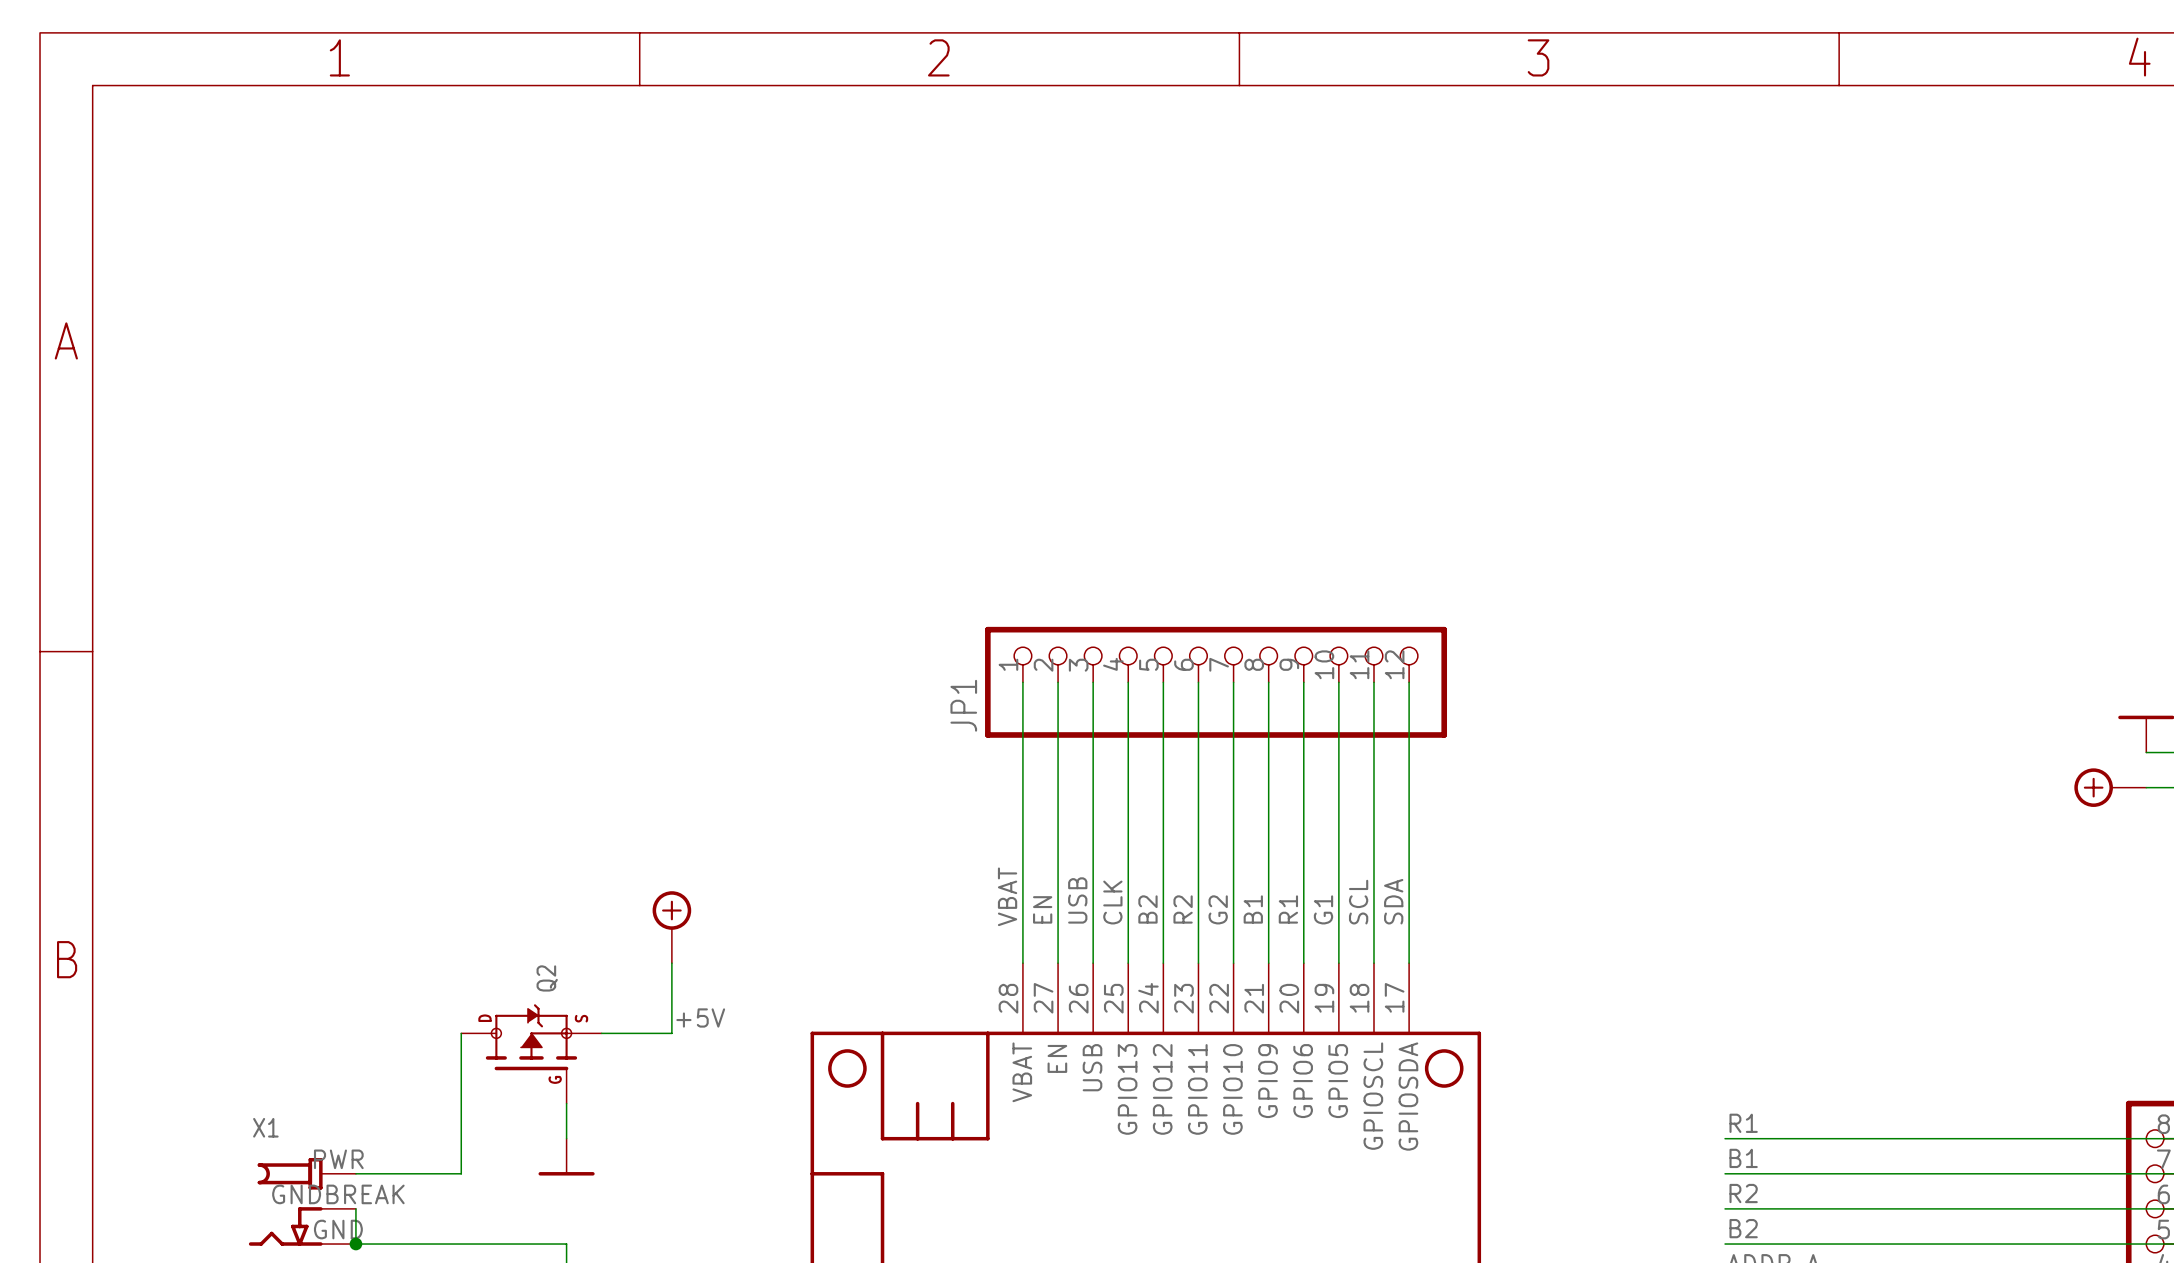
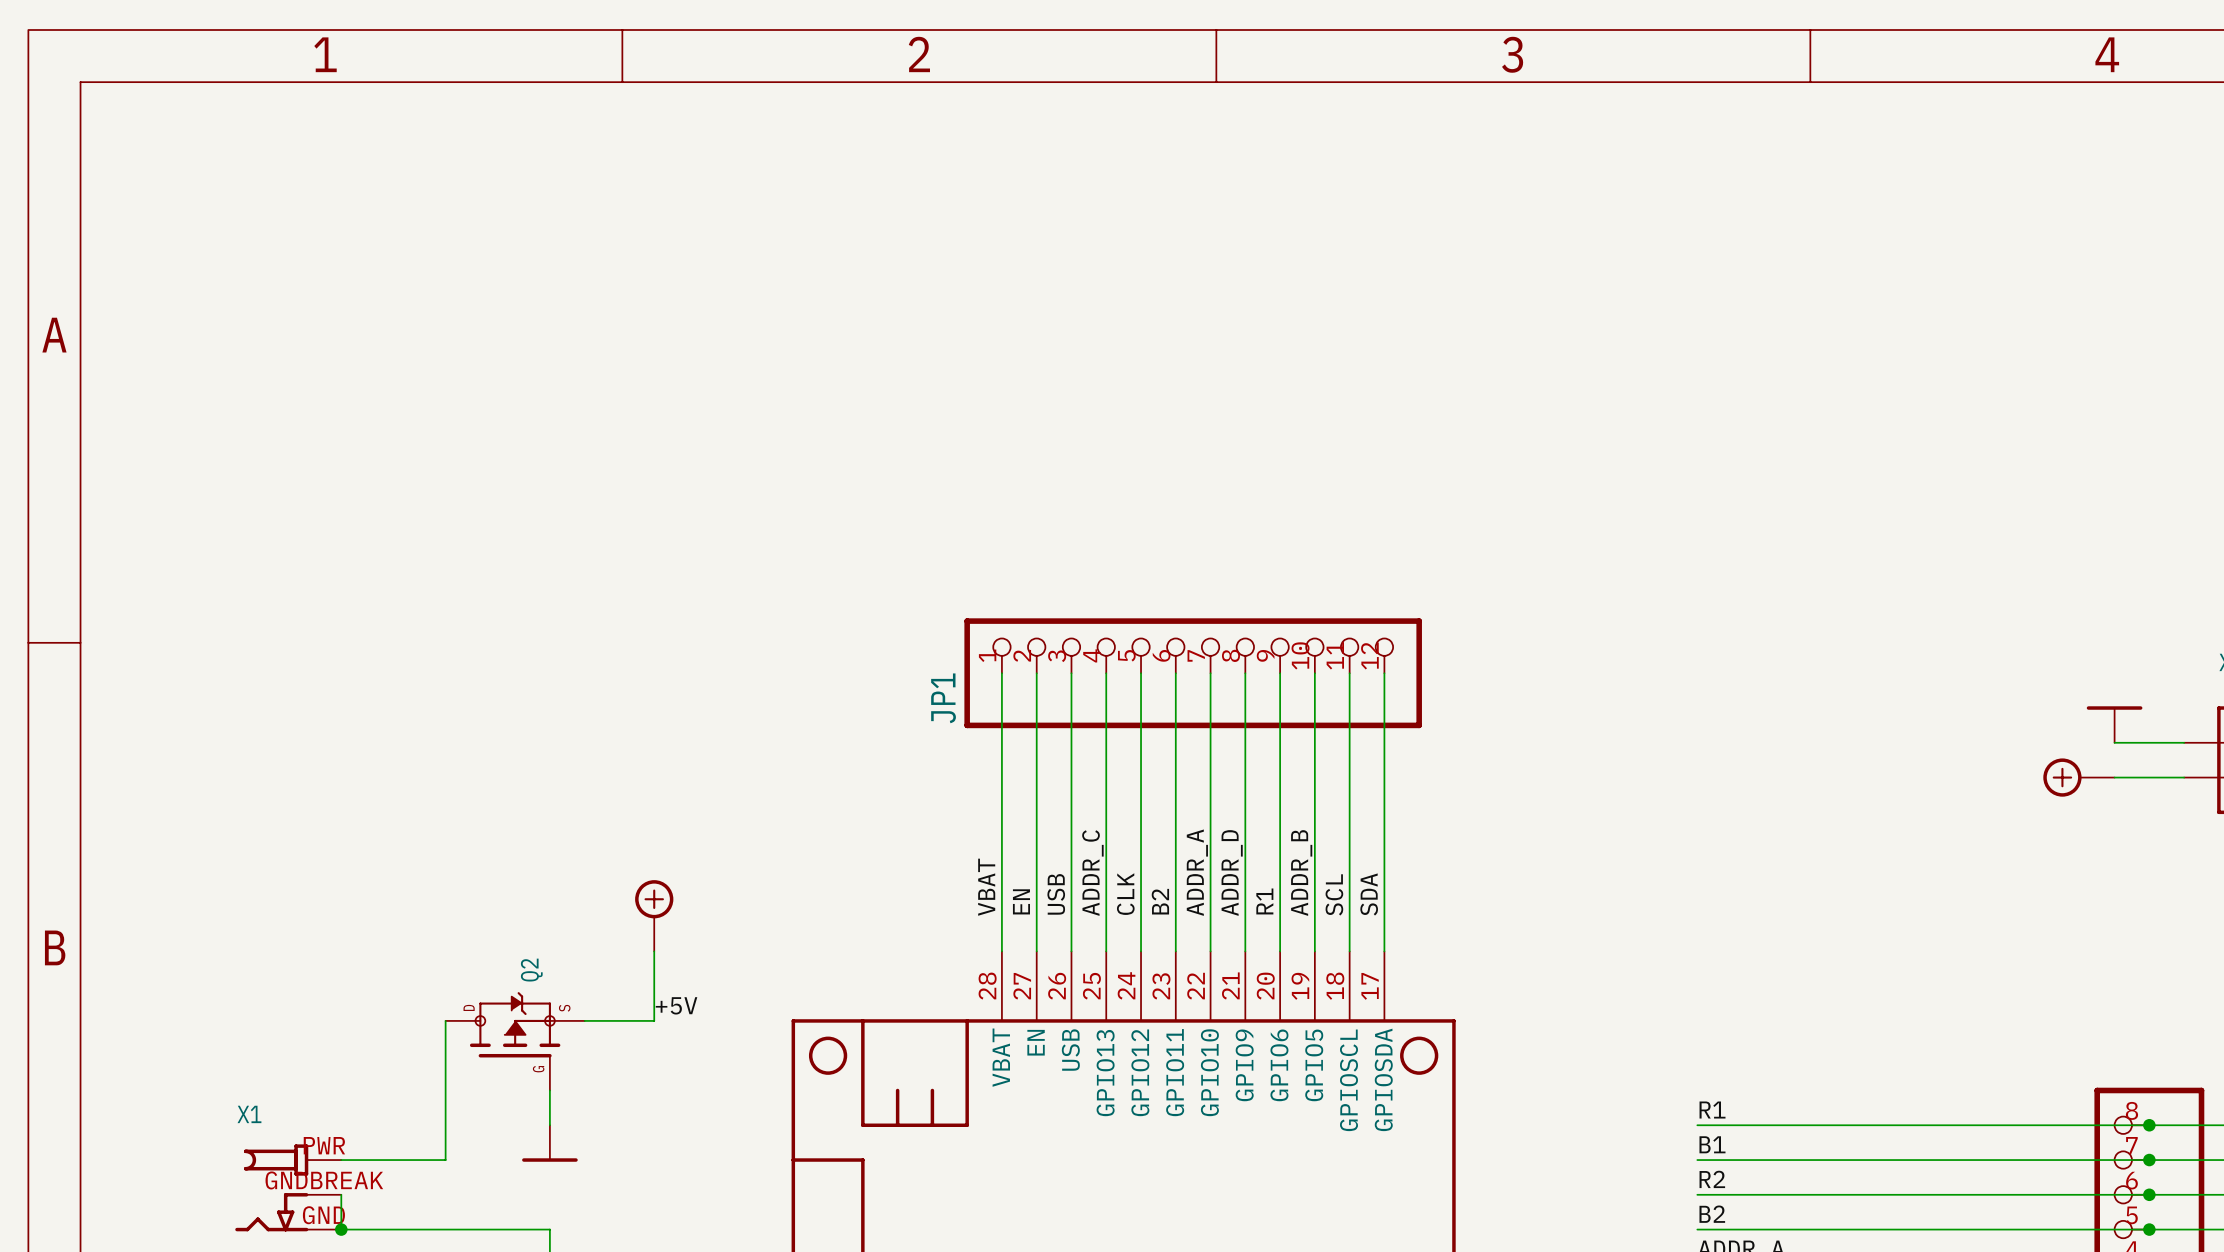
label: CLK (1112, 902) -> ADDR_C (1092, 873)
label: B2 (1147, 909) -> CLK (1125, 894)
label: R2 (1183, 909) -> B2 (1160, 901)
label: G2 (1218, 909) -> ADDR_A (1197, 872)
label: B1 (1253, 909) -> ADDR_D (1232, 873)
label: G1 (1323, 909) -> ADDR_B (1301, 873)

